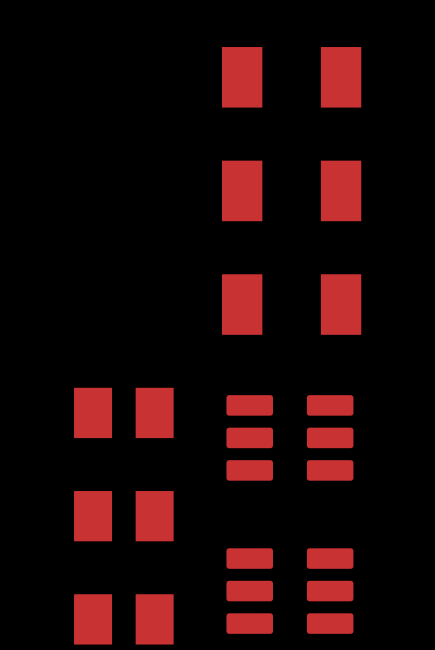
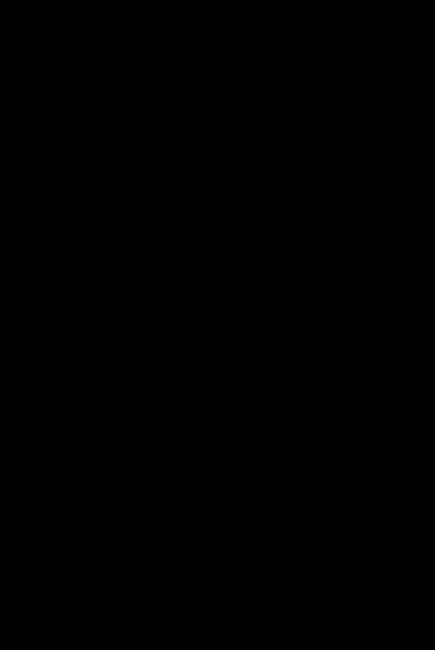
part: (291, 77) -> none
part: (291, 190) -> none
part: (291, 304) -> none
part: (123, 412) -> none
part: (289, 437) -> none
part: (123, 516) -> none
part: (289, 591) -> none
part: (123, 619) -> none

